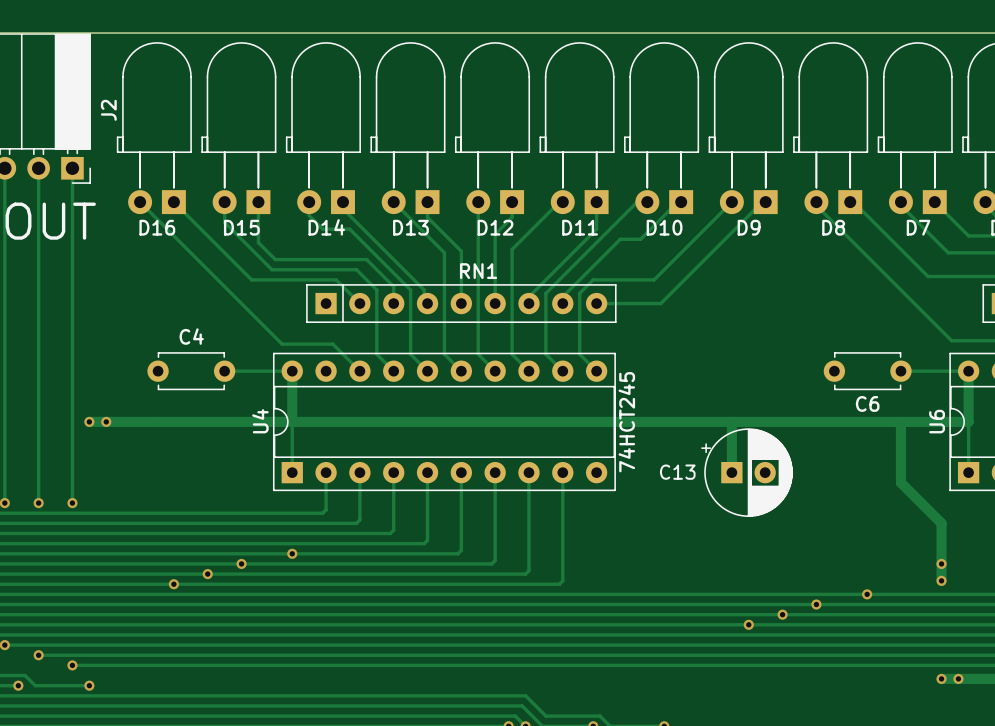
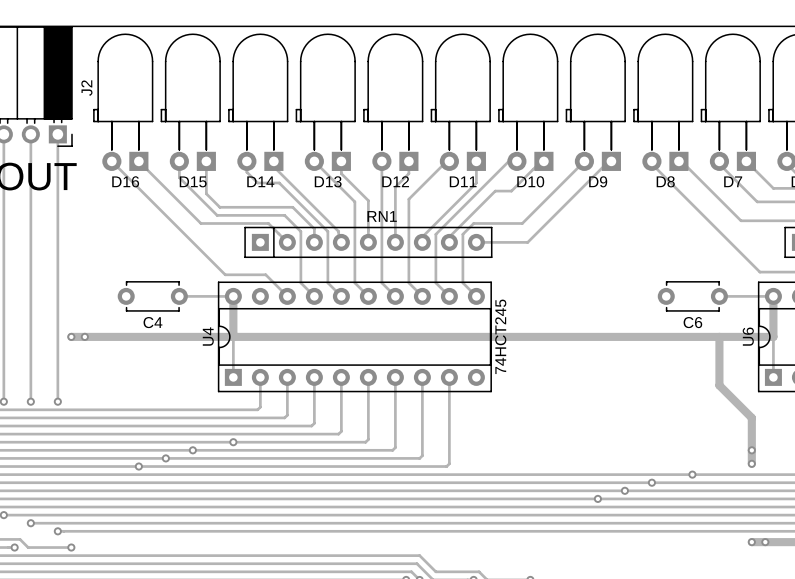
C4 name position: C4 (191, 336) -> C4 (152, 322)
track: (731, 421) (731, 472) -> none
C13: (746, 472) -> none

